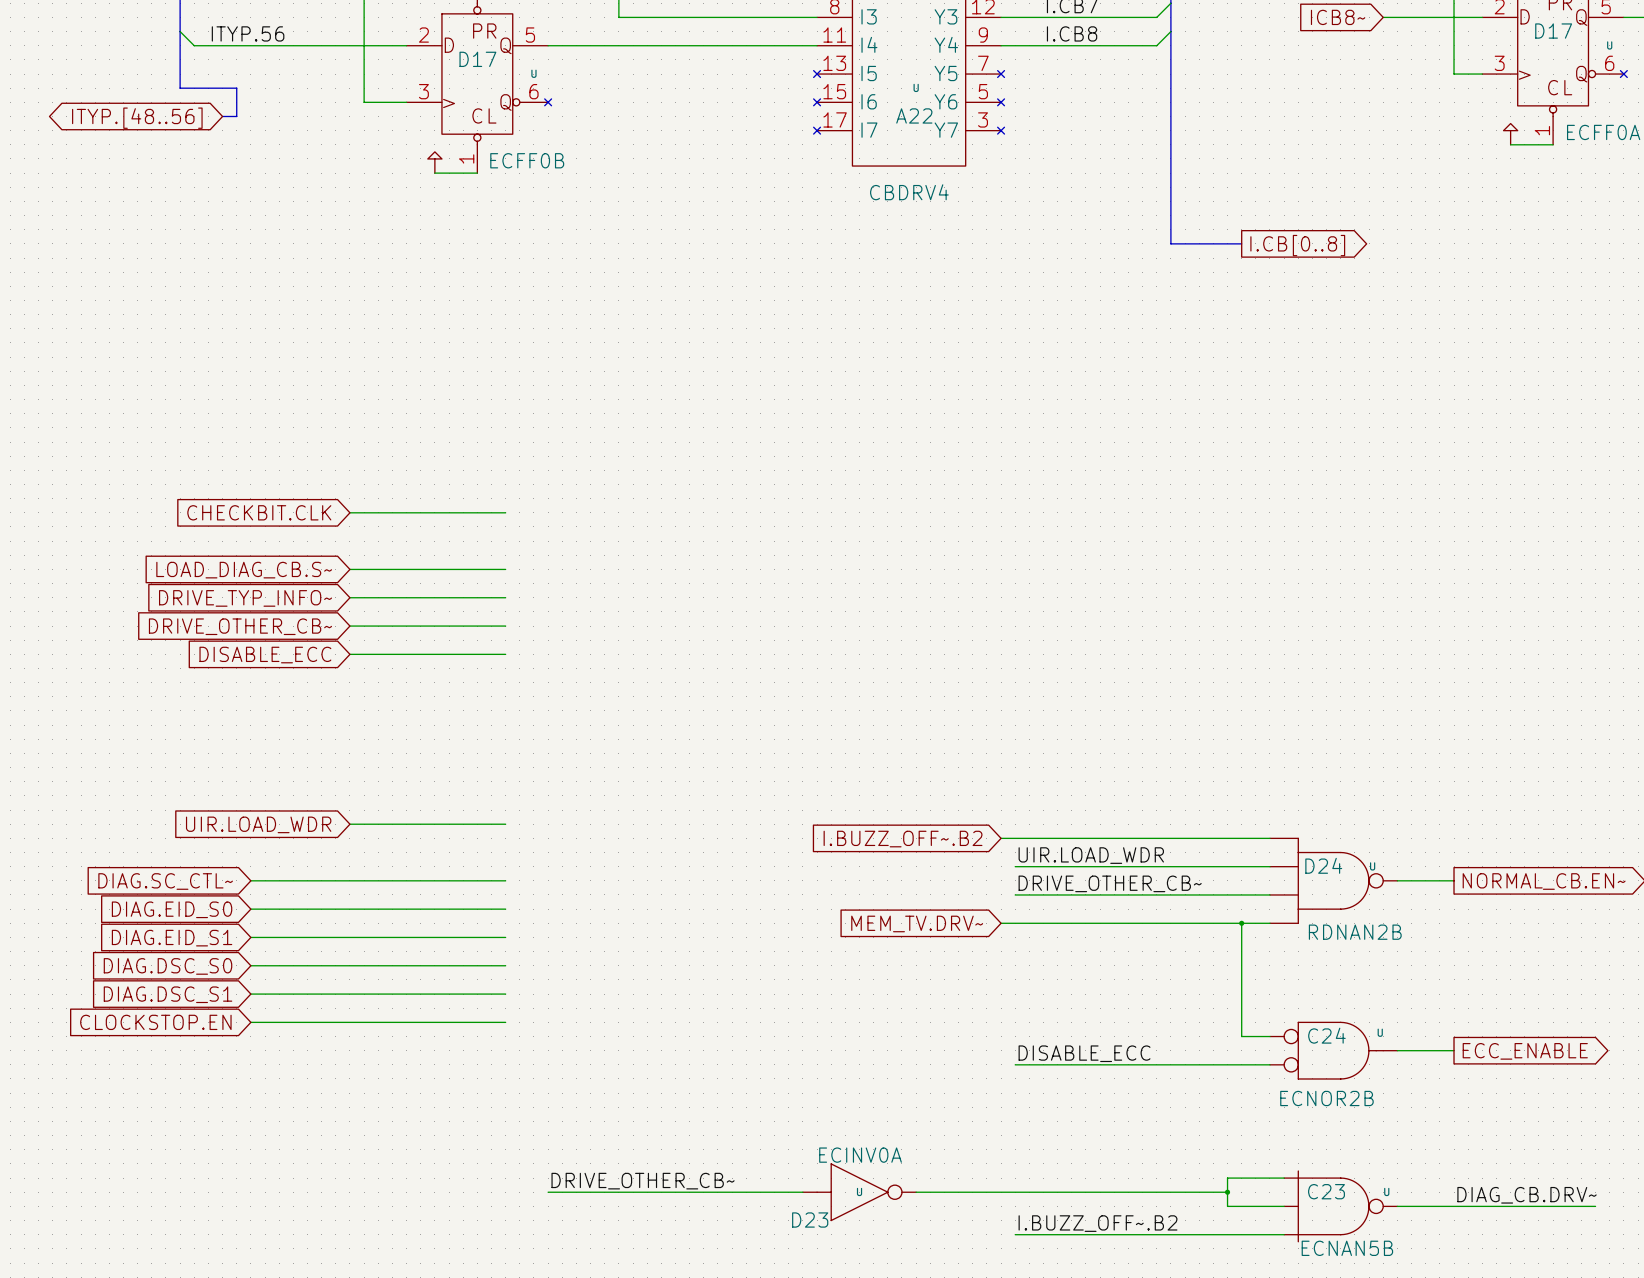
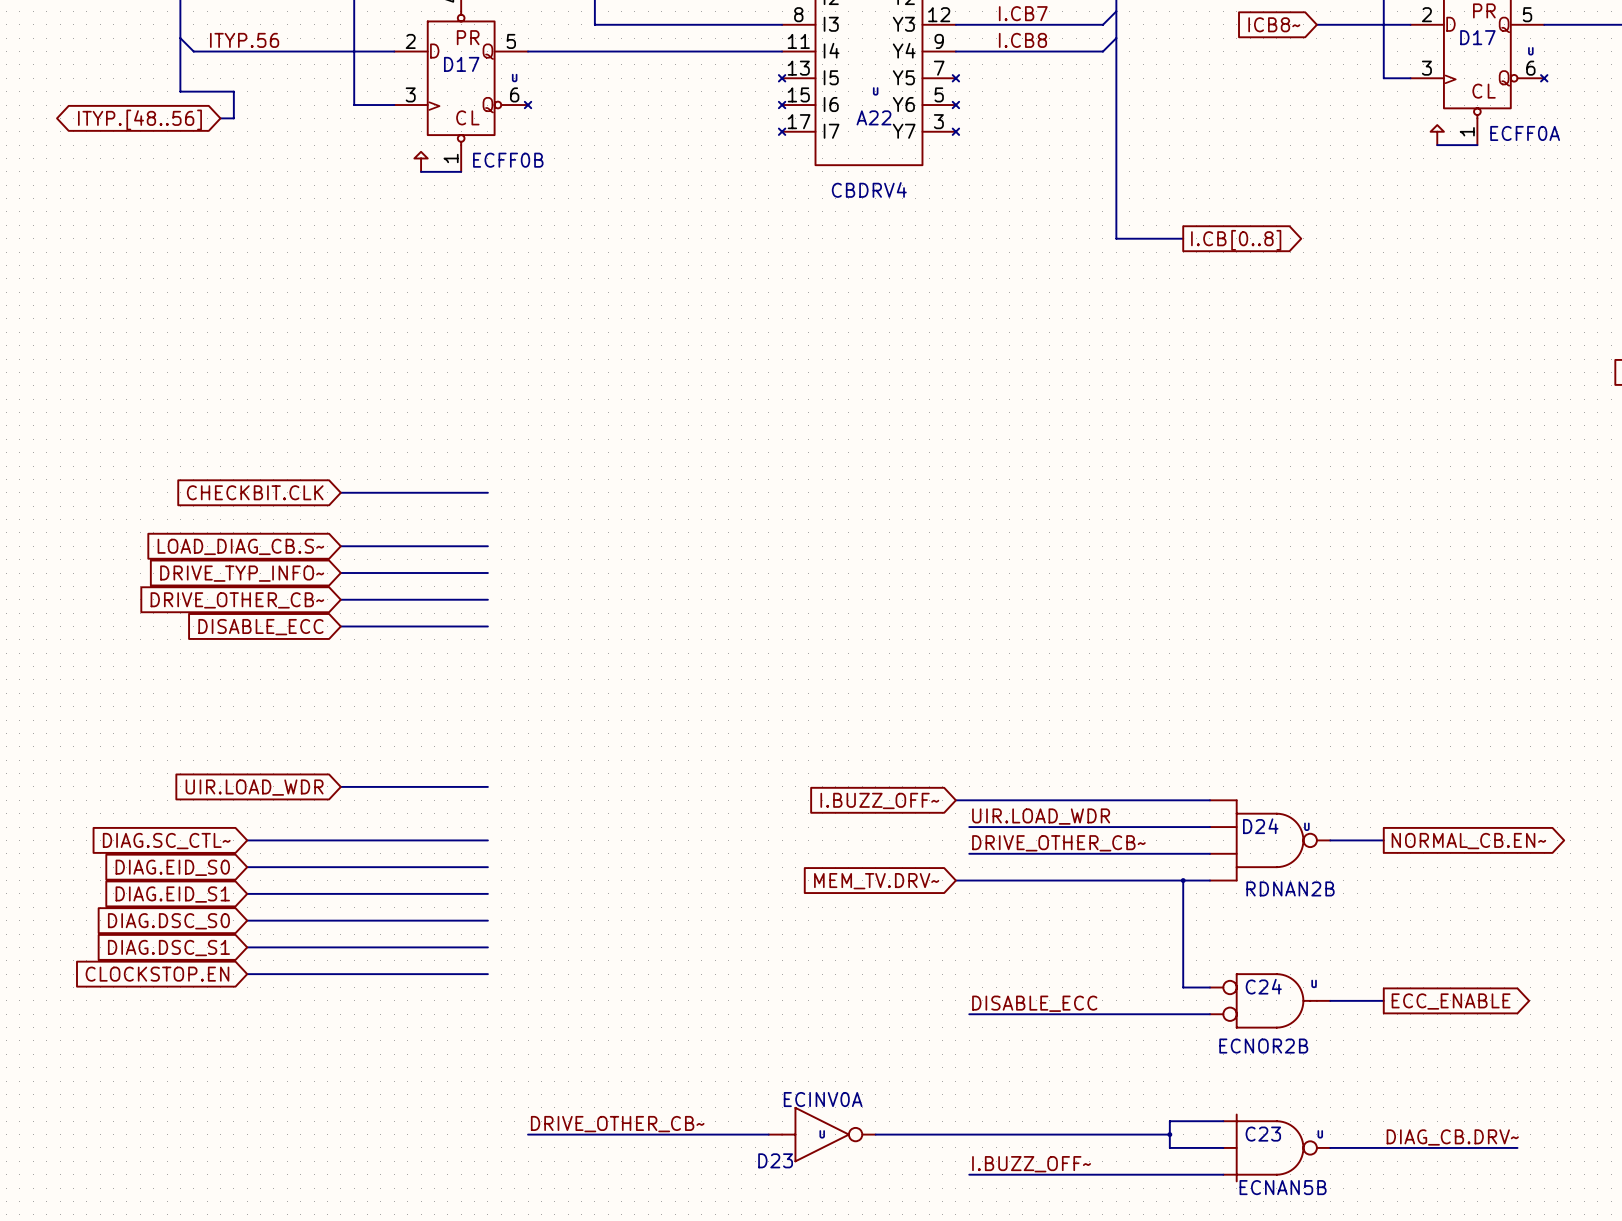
global label: I.BUZZ_OFF~.B2 (903, 839) -> I.BUZZ_OFF~ (879, 800)
label: I.BUZZ_OFF~.B2 (1098, 1223) -> I.BUZZ_OFF~ (1031, 1164)

